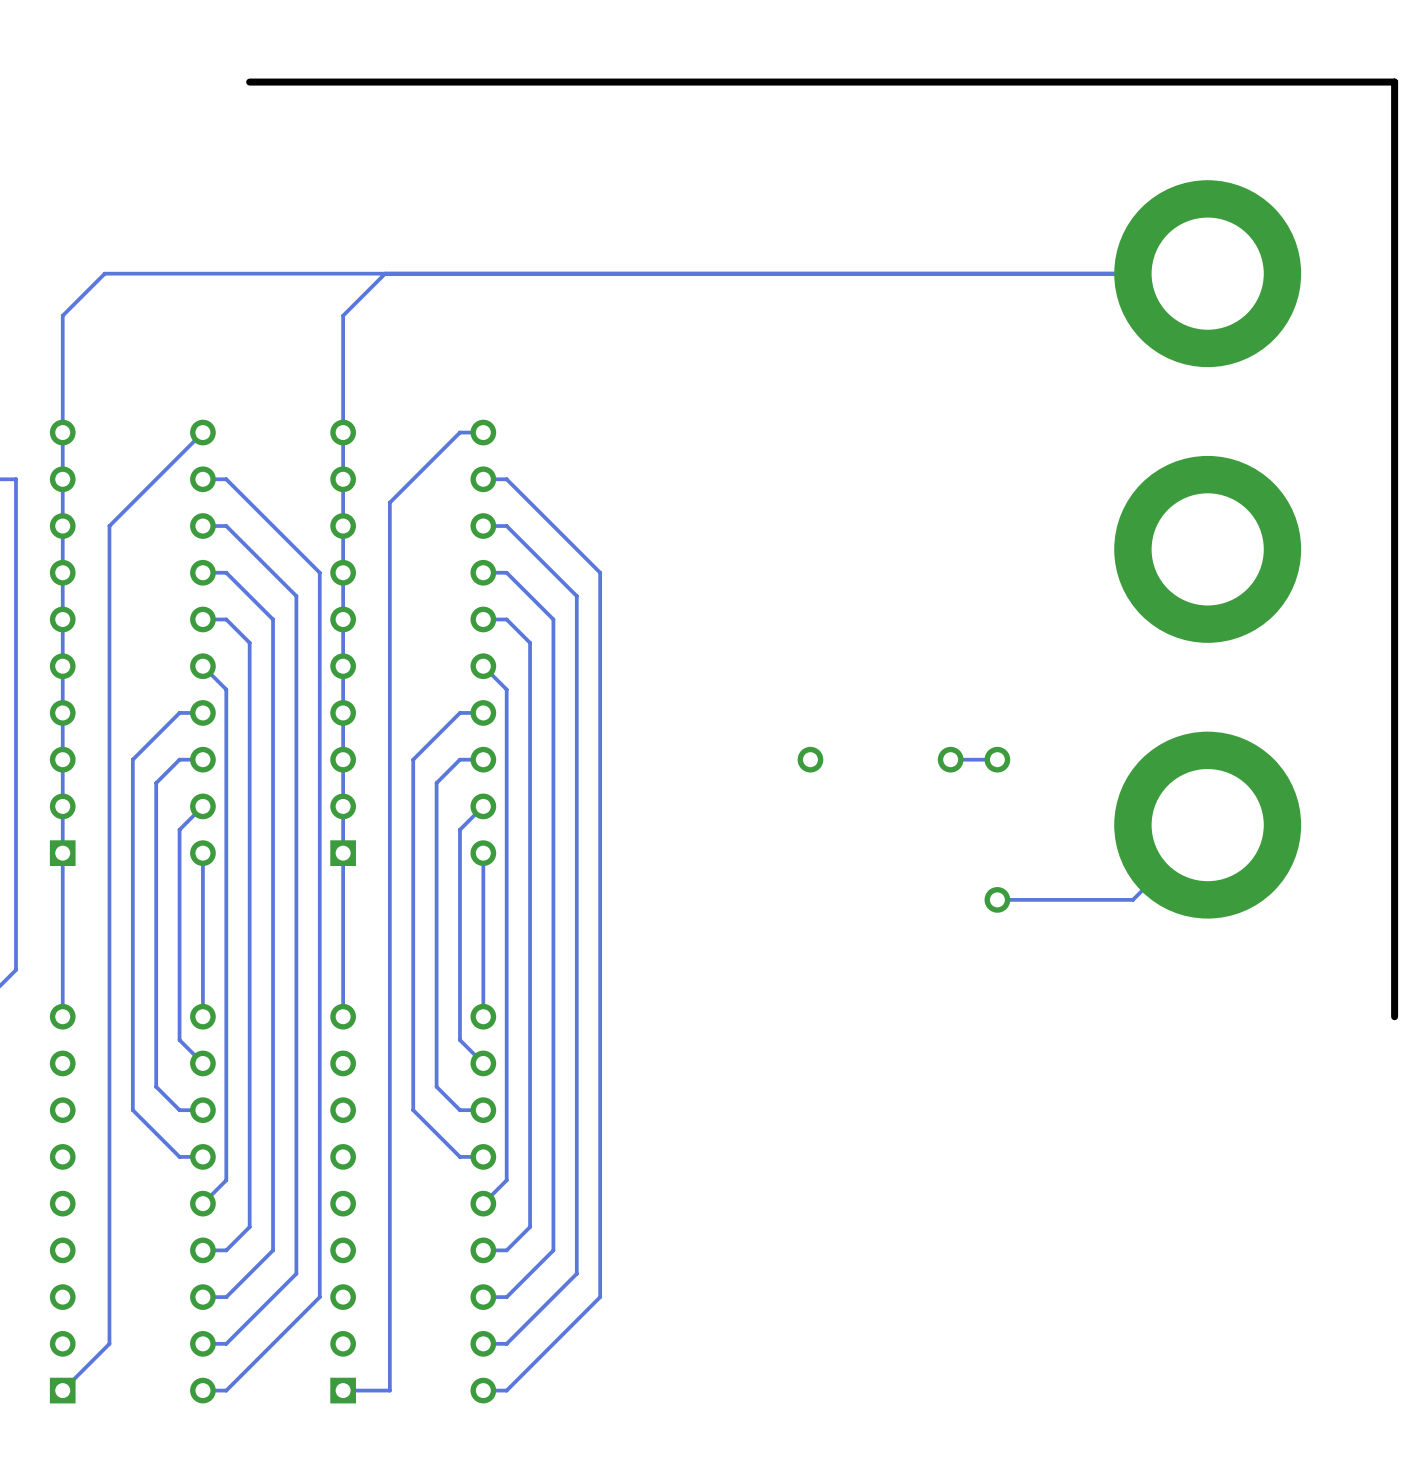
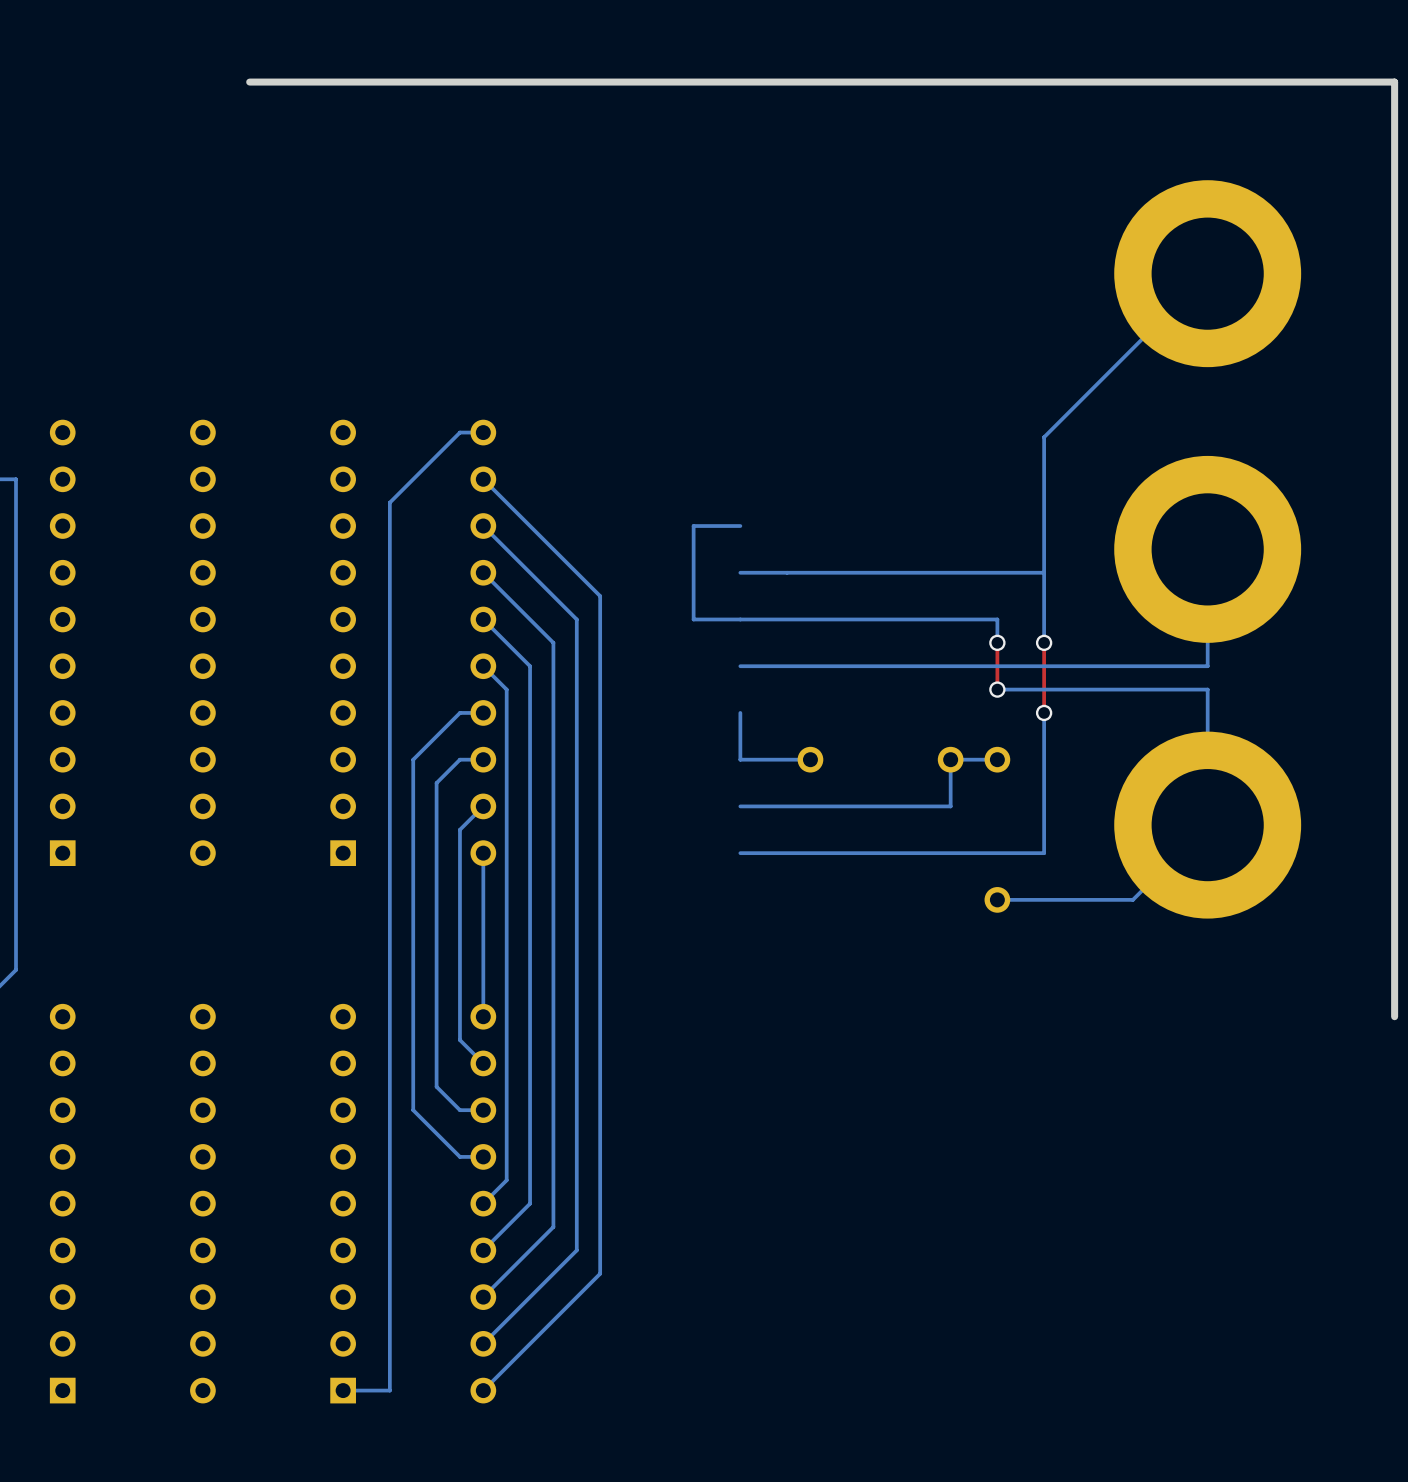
bottom track: (385, 273) (343, 315) (343, 1016) -> none
bottom track: (1207, 273) (104, 273) (62, 315) (62, 1016) -> (1207, 273) (1044, 437) (1044, 642)
bottom track: (202, 432) (109, 526) (109, 1343) (62, 1390) -> none
bottom track: (202, 479) (226, 479) (319, 572) (319, 1297) (226, 1390) (202, 1390) -> none
bottom track: (483, 479) (506, 479) (600, 572) (600, 596) -> (483, 479) (600, 596)
bottom track: (202, 526) (226, 526) (296, 596) (296, 1273) (226, 1343) (202, 1343) -> none
bottom track: (483, 526) (506, 526) (576, 596) (576, 619) -> (483, 526) (576, 619)
bottom track: none -> (740, 526) (693, 526) (693, 619) (997, 619) (997, 642)
bottom track: none -> (1207, 549) (1207, 666) (740, 666)
bottom track: (202, 572) (226, 572) (273, 619) (273, 1250) (226, 1297) (202, 1297) -> none
bottom track: (483, 572) (506, 572) (553, 619) (553, 642) -> (483, 572) (553, 642)
bottom track: none -> (1044, 572) (740, 572)
bottom track: (202, 619) (226, 619) (249, 642) (249, 1227) (226, 1250) (202, 1250) -> none
bottom track: (483, 619) (506, 619) (530, 642) (530, 666) -> (483, 619) (530, 666)
top track: none -> (997, 642) (997, 689)
via: none -> (997, 642)
top track: none -> (1044, 642) (1044, 712)
via: none -> (1044, 642)
bottom track: (202, 666) (226, 689) (226, 1180) (202, 1203) -> none
bottom track: none -> (997, 689) (1207, 689) (1207, 825)
via: none -> (997, 689)
bottom track: (202, 712) (179, 712) (132, 759) (132, 1110) (179, 1156) (202, 1156) -> none
bottom track: none -> (740, 712) (740, 759) (810, 759)
bottom track: none -> (1044, 712) (1044, 853) (740, 853)
via: none -> (1044, 712)
bottom track: (202, 759) (179, 759) (156, 783) (156, 1086) (179, 1110) (202, 1110) -> none
bottom track: none -> (950, 759) (950, 806) (740, 806)
bottom track: (202, 806) (179, 829) (179, 1040) (202, 1063) -> none
bottom track: (202, 853) (202, 1016) -> none
bottom track: (530, 1203) (530, 1227) (506, 1250) (483, 1250) -> (530, 1203) (483, 1250)
bottom track: (553, 1227) (553, 1250) (506, 1297) (483, 1297) -> (553, 1227) (483, 1297)
bottom track: (576, 1250) (576, 1273) (506, 1343) (483, 1343) -> (576, 1250) (483, 1343)
bottom track: (600, 1273) (600, 1297) (506, 1390) (483, 1390) -> (600, 1273) (483, 1390)

